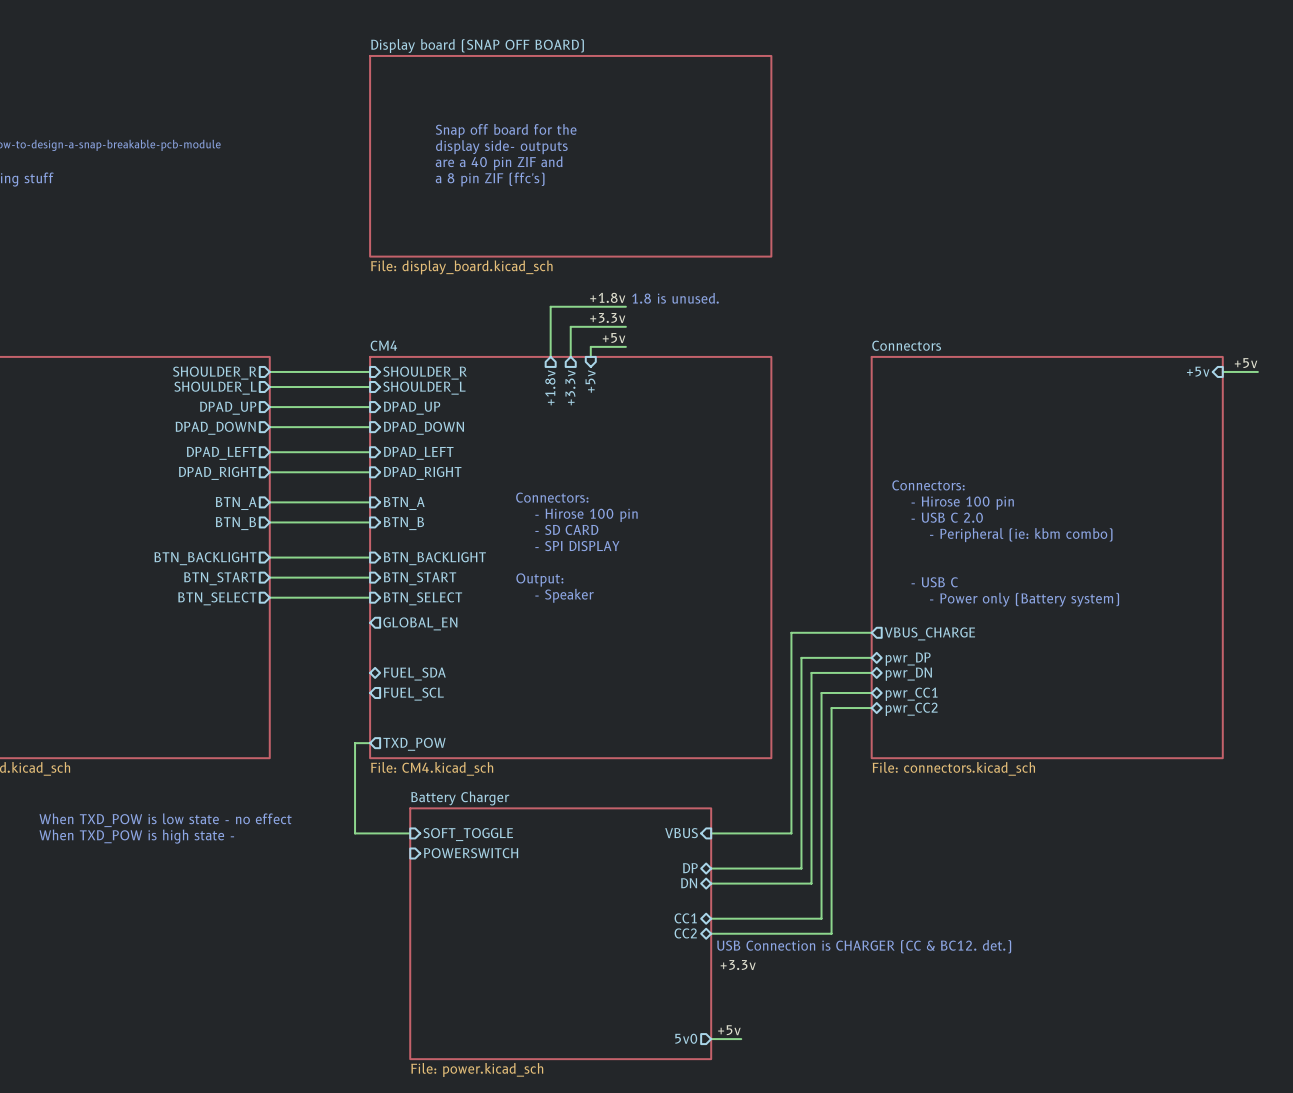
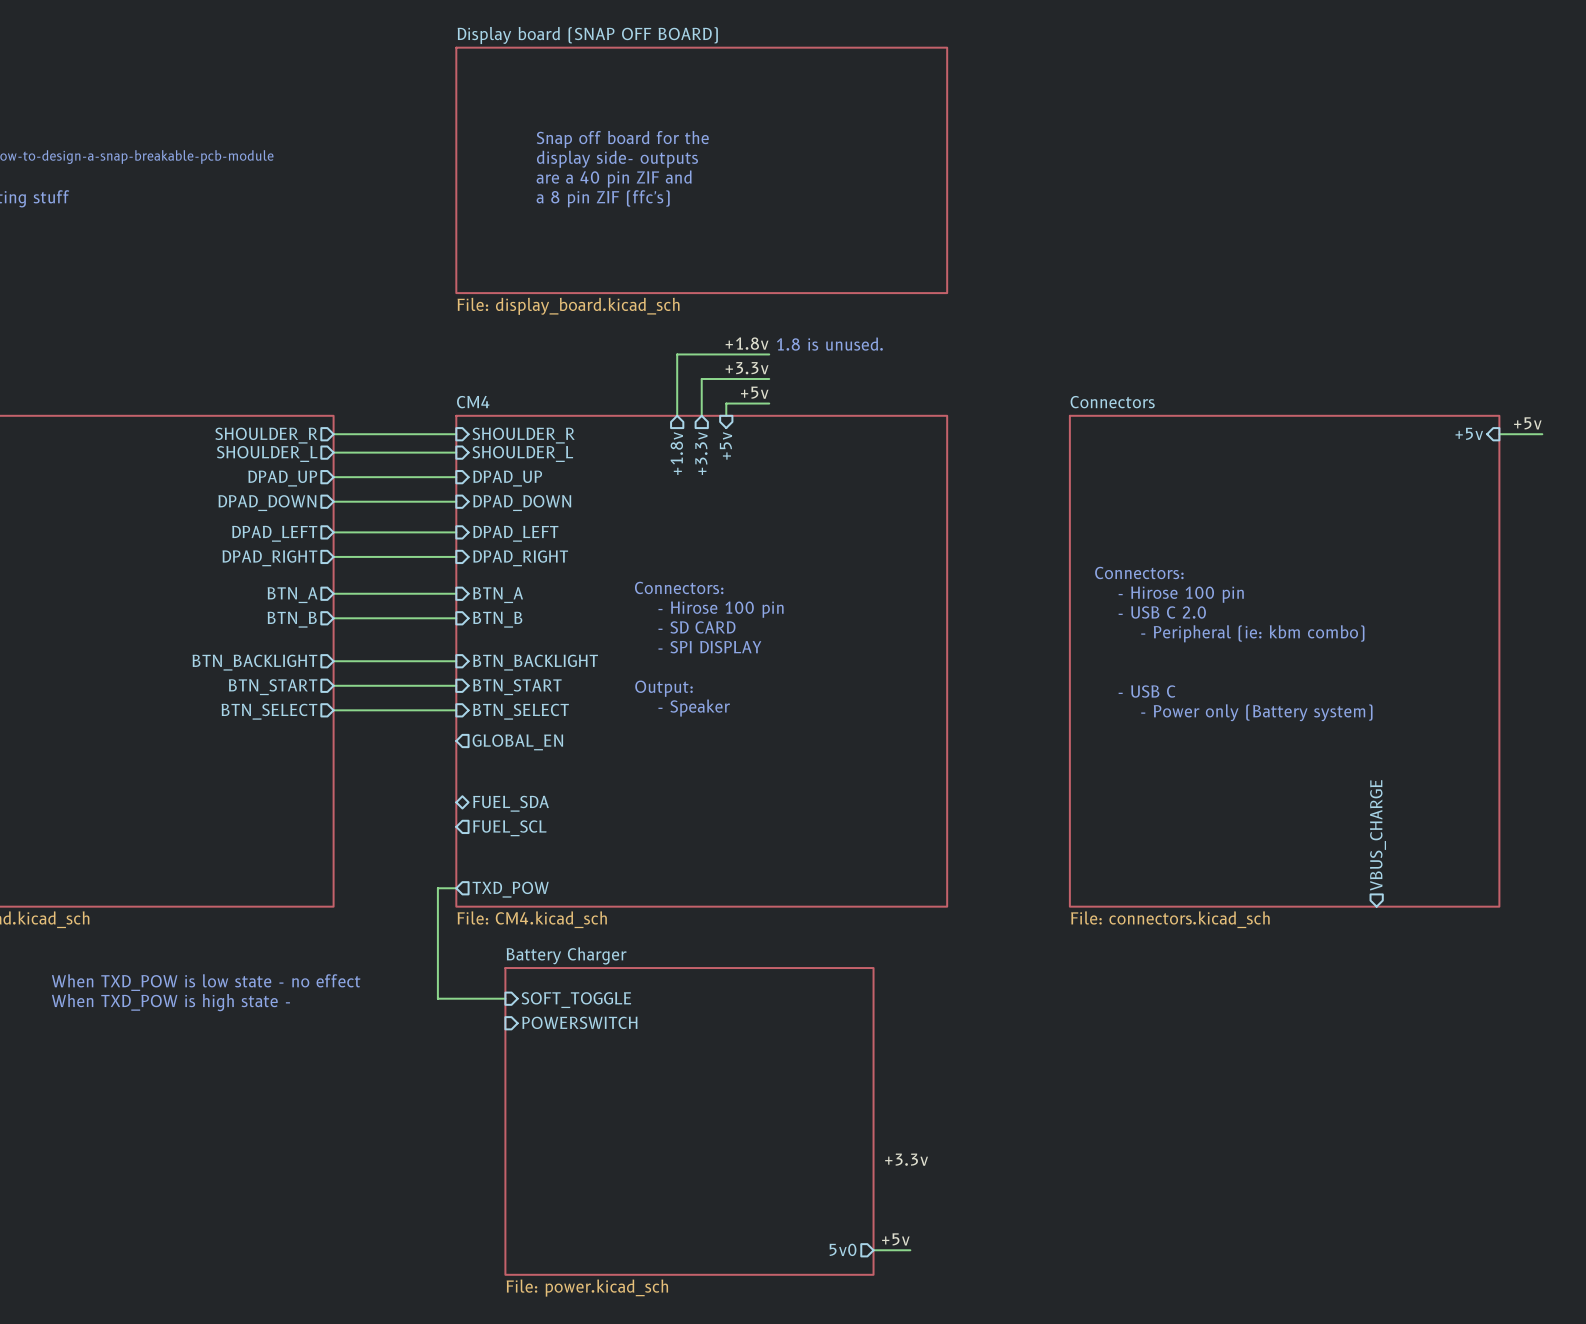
wire: (871, 632) (791, 632) (791, 833) (711, 833) -> none
sheet pin: VBUS_CHARGE (930, 633) -> none
wire: (871, 657) (801, 657) (801, 868) (711, 868) -> none
sheet pin: pwr_DP (908, 659) -> none
wire: (871, 672) (811, 672) (811, 883) (711, 883) -> none
sheet pin: pwr_DN (908, 674) -> none
wire: (871, 692) (821, 692) (821, 918) (711, 918) -> none
sheet pin: pwr_CC1 (911, 694) -> none
sheet pin: none -> VBUS_CHARGE (1378, 835)
wire: (871, 708) (831, 708) (831, 933) (711, 933) -> none
sheet pin: pwr_CC2 (911, 709) -> none
sheet pin: VBUS (681, 833) -> none
sheet pin: DP (690, 868) -> none
sheet pin: DN (689, 883) -> none
sheet pin: CC1 (685, 918) -> none
sheet pin: CC2 (685, 933) -> none
text: USB Connection is CHARGER (CC & BC12. det.) (864, 946) -> none

